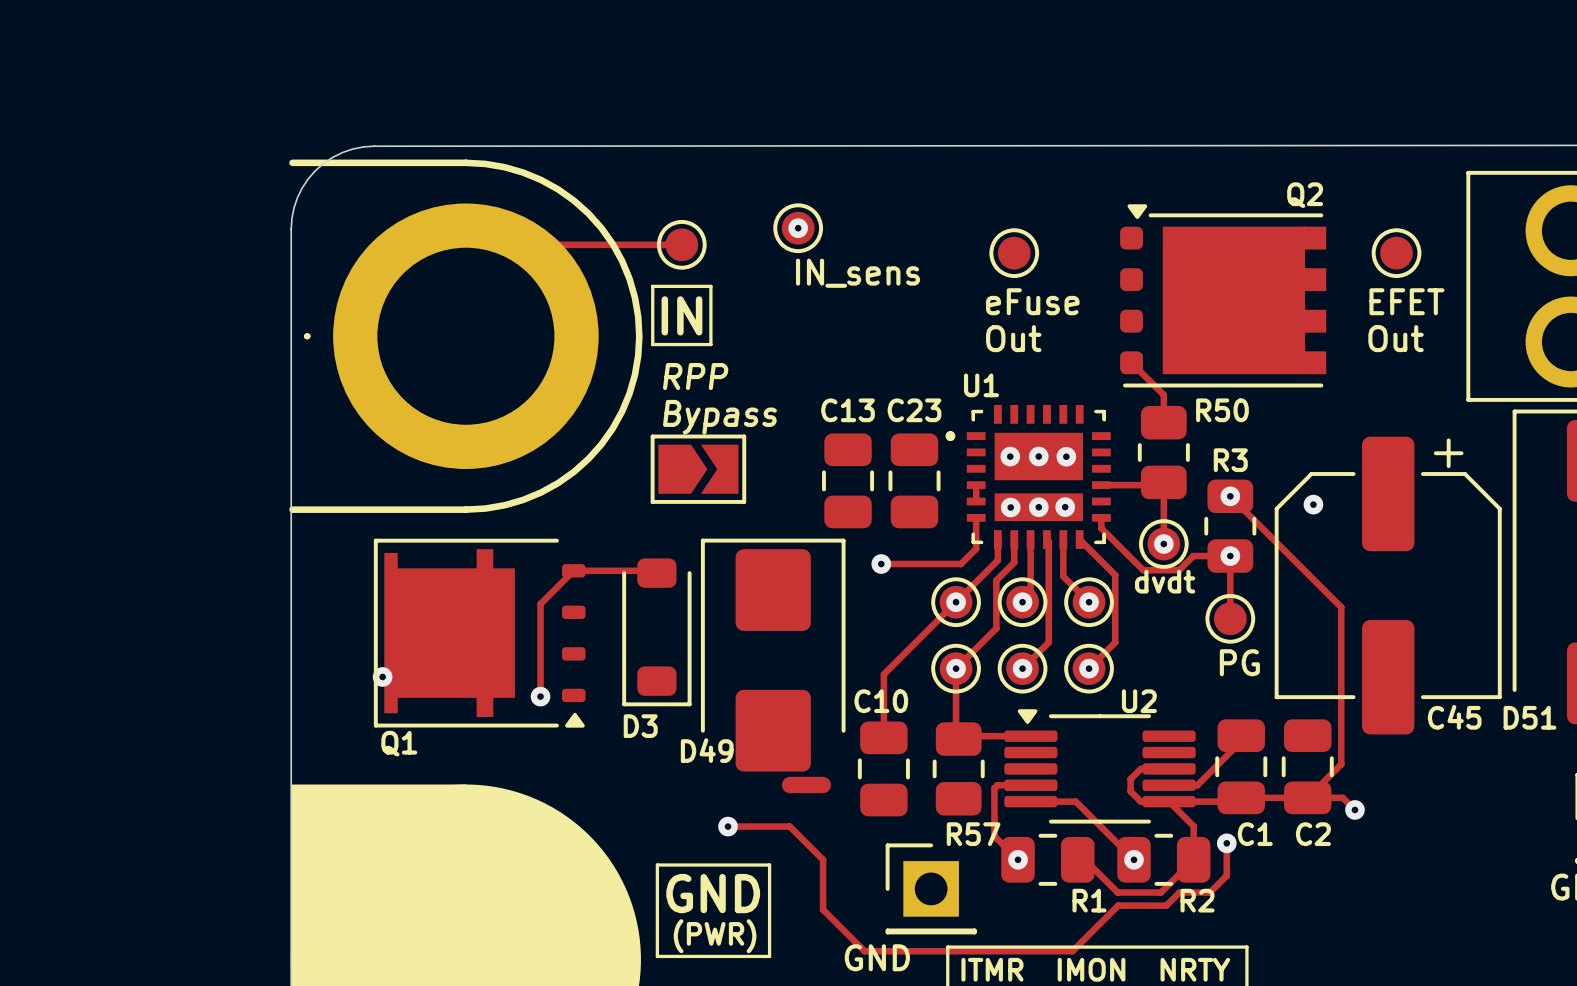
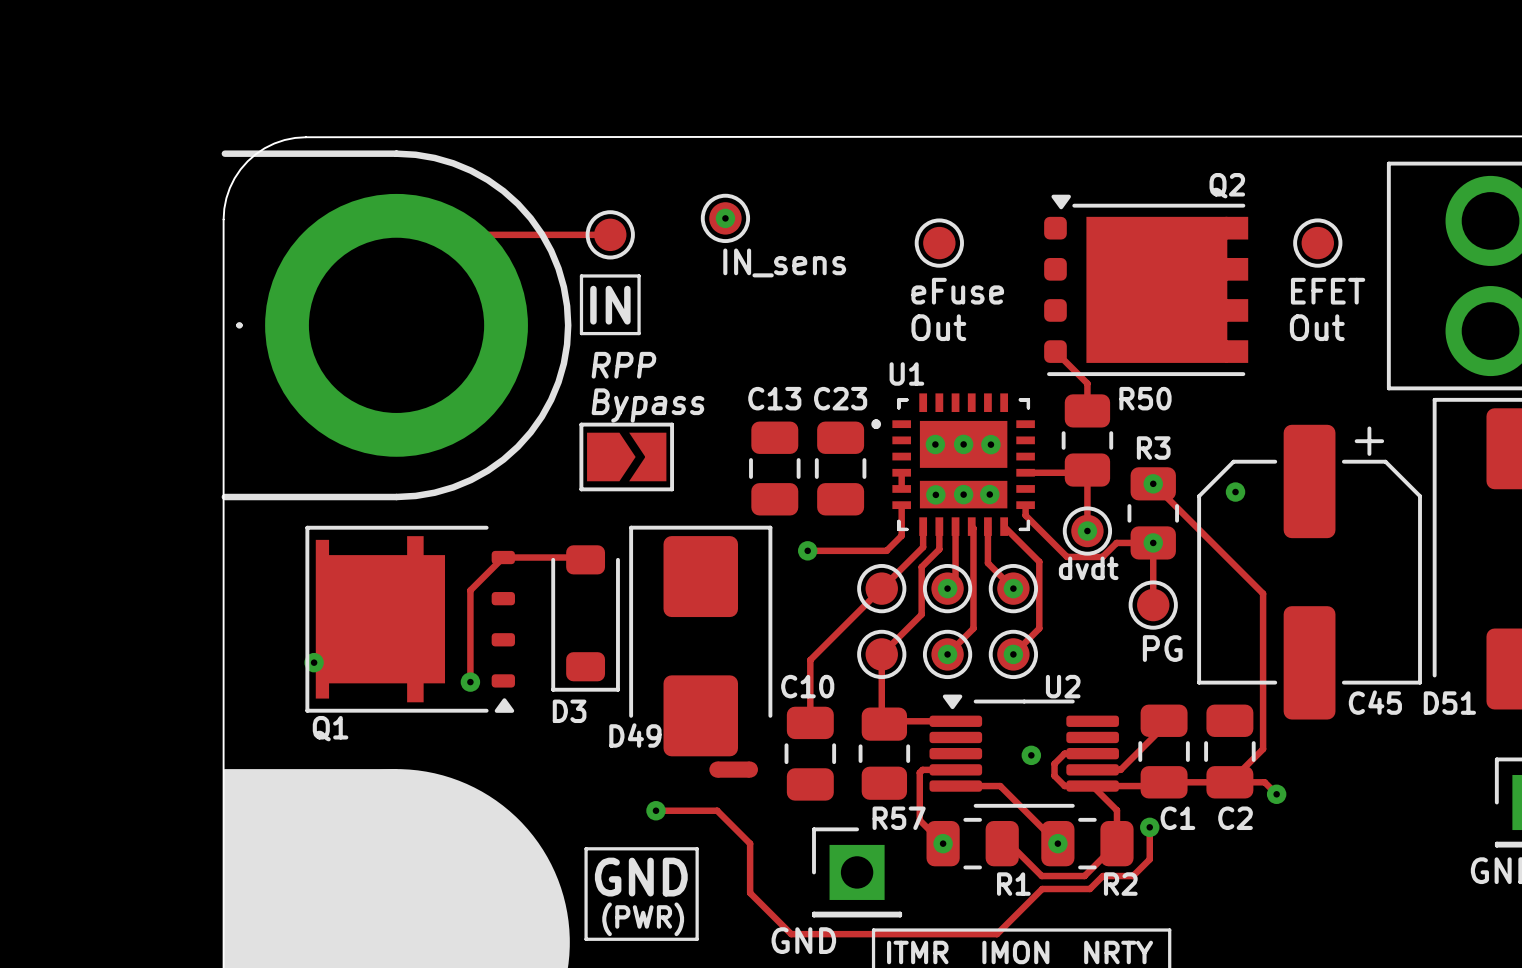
via: (956, 602) -> none
via: (956, 668) -> none
via: none -> (1031, 755)

